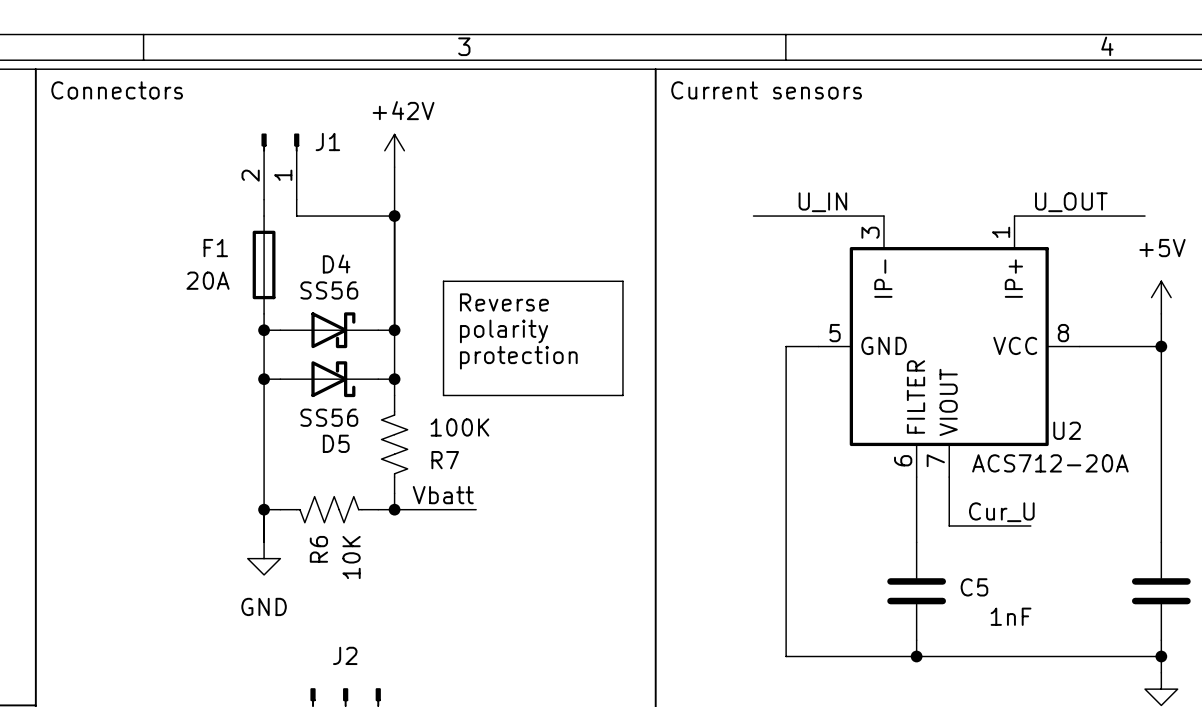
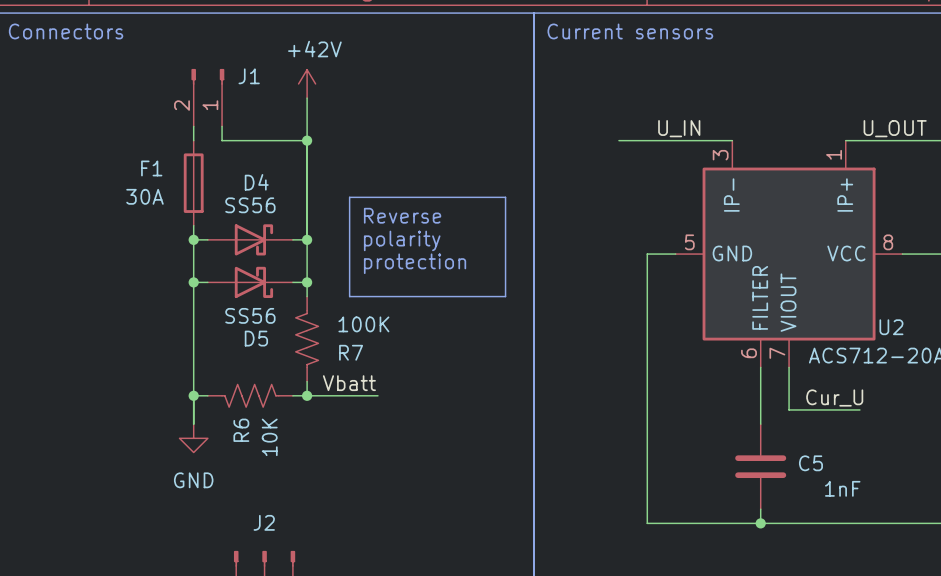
F1 value: 20A (208, 280) -> 30A (144, 196)

